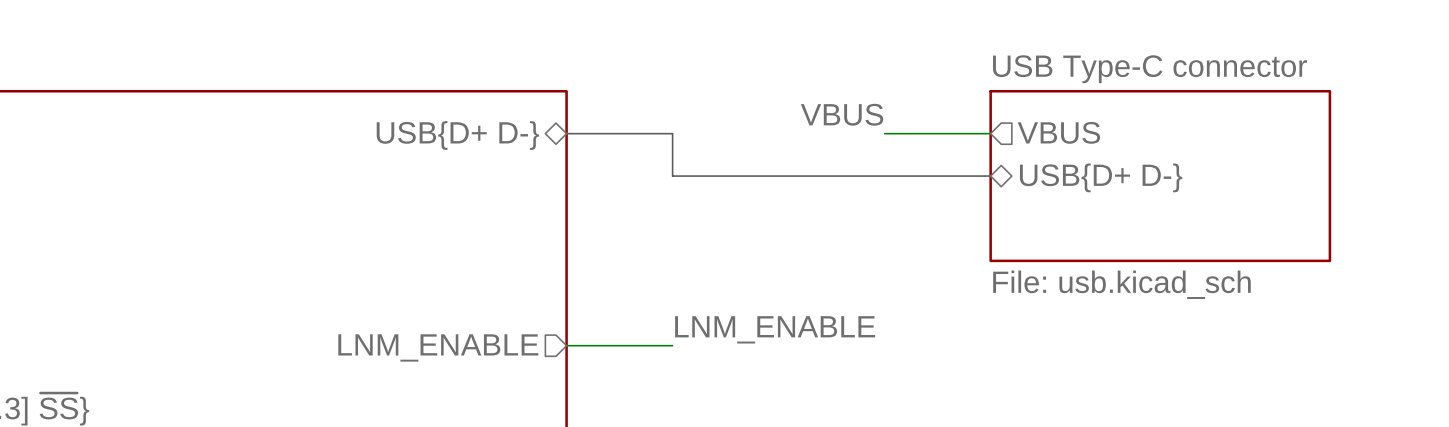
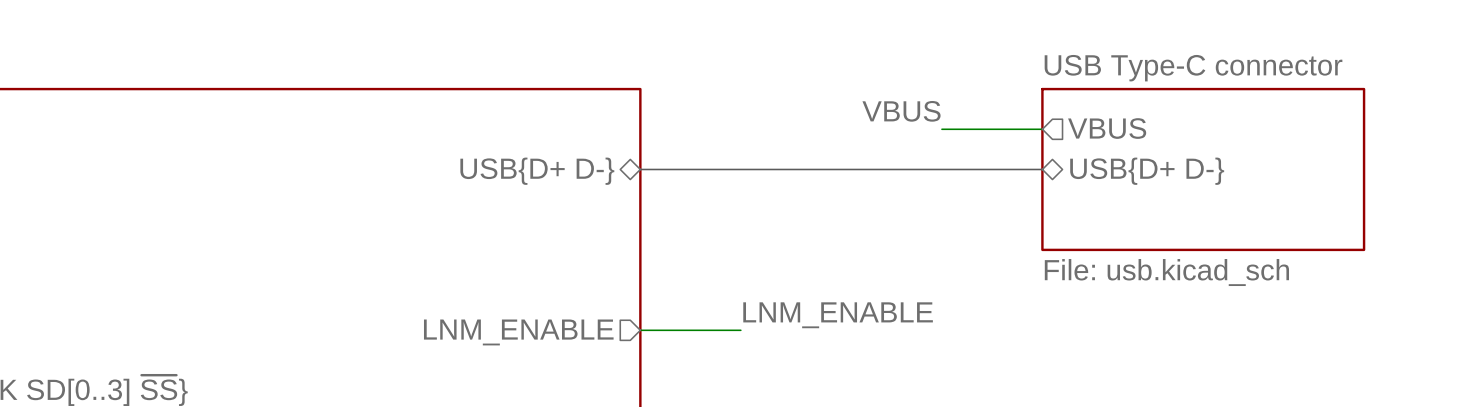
bus: (566, 133) (672, 133) (672, 176) -> (640, 169) (740, 169)
sheet pin position: USB{D+ D-} (457, 135) -> USB{D+ D-} (537, 171)

